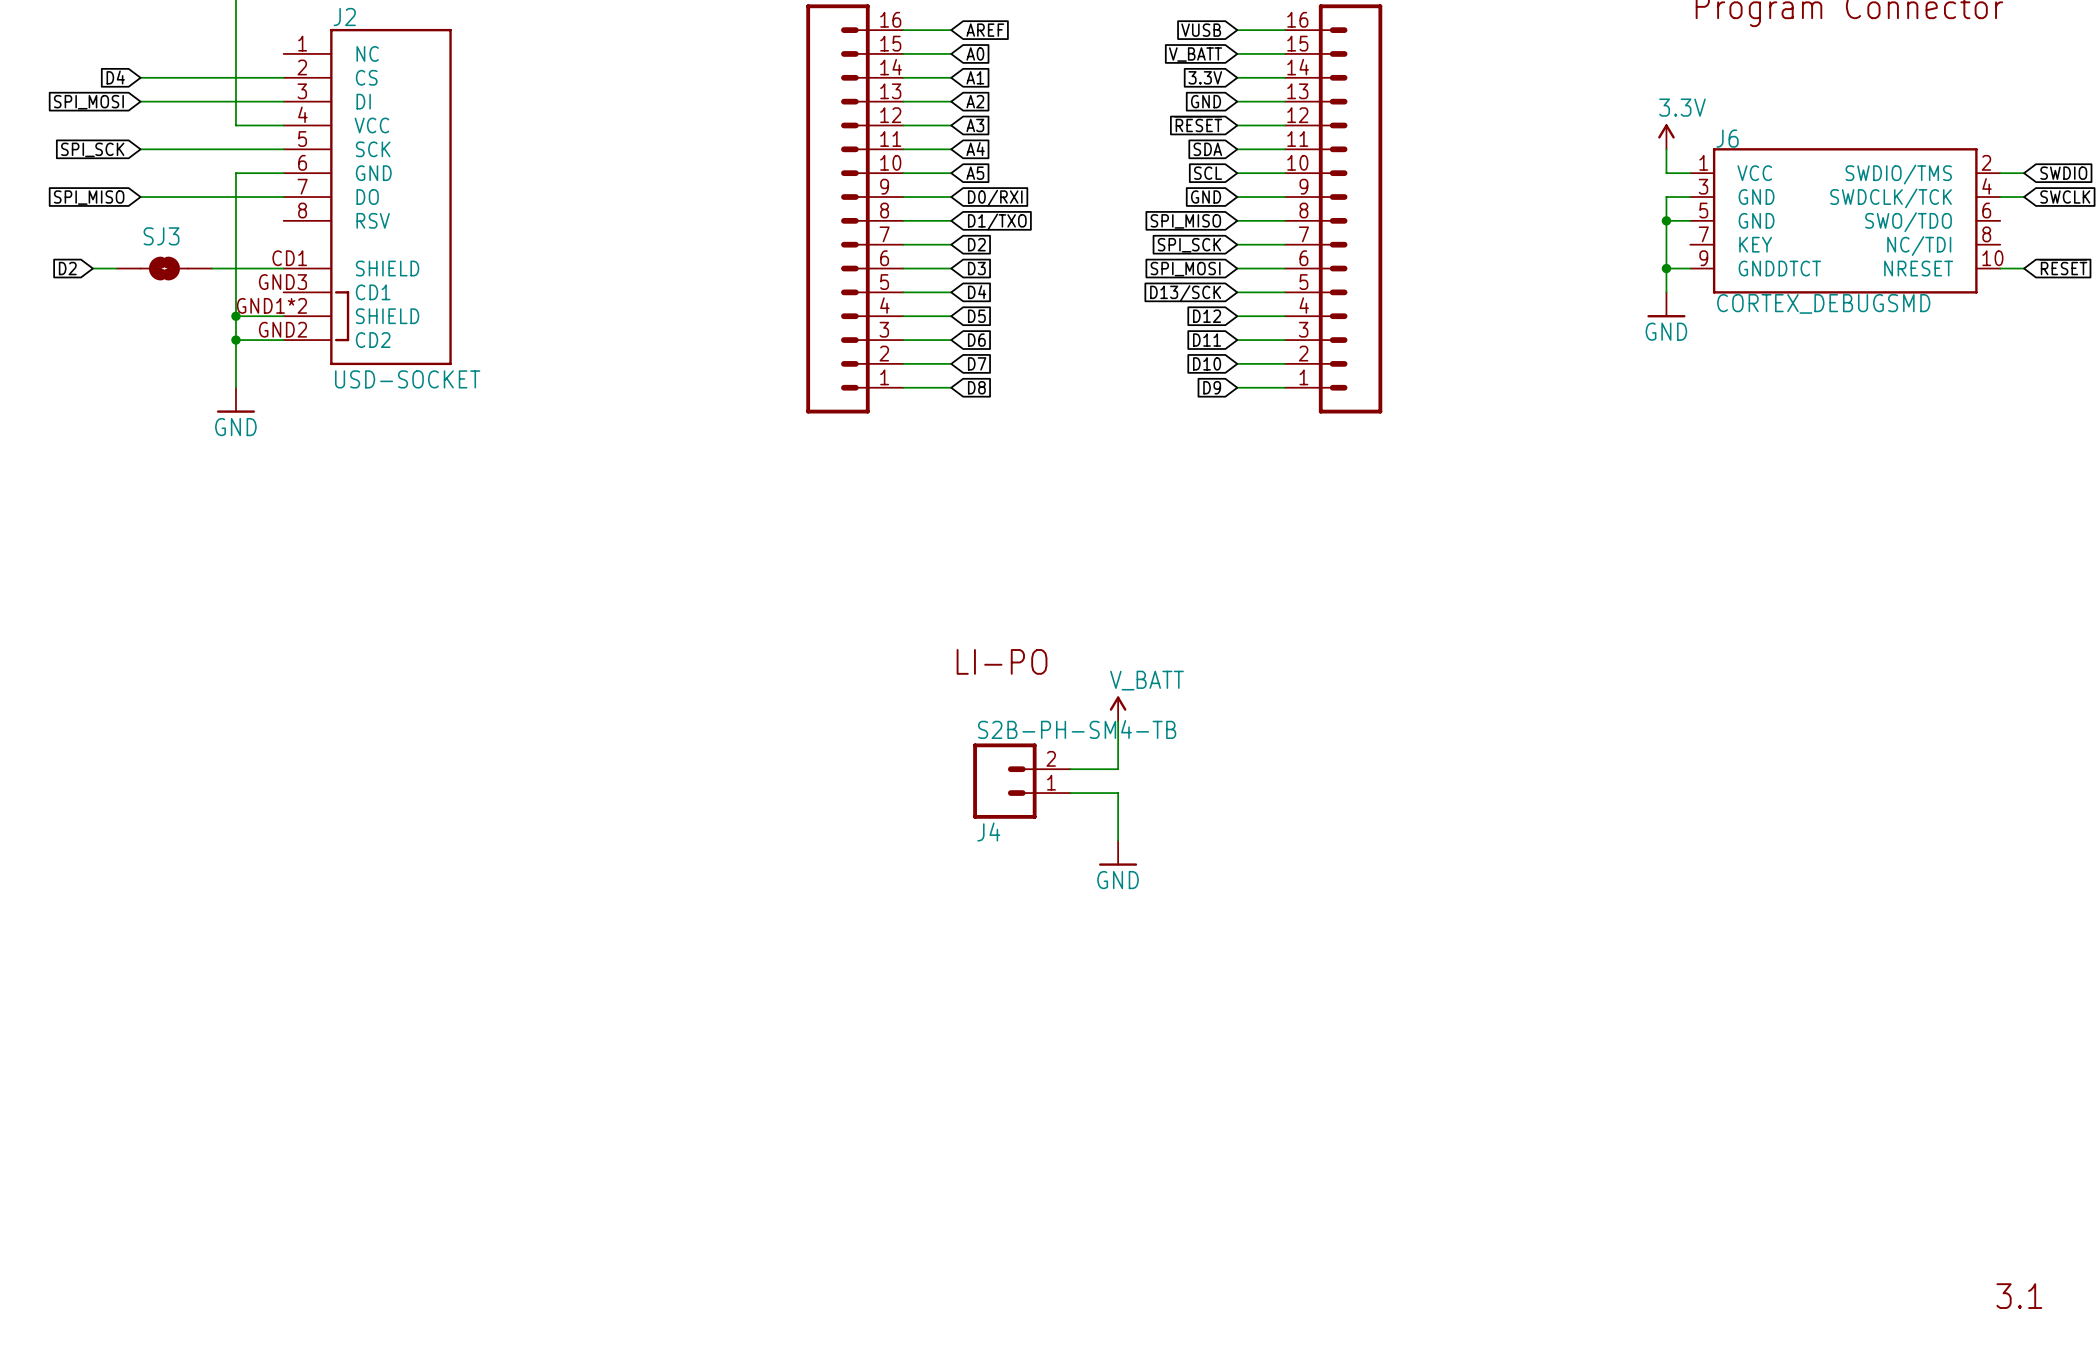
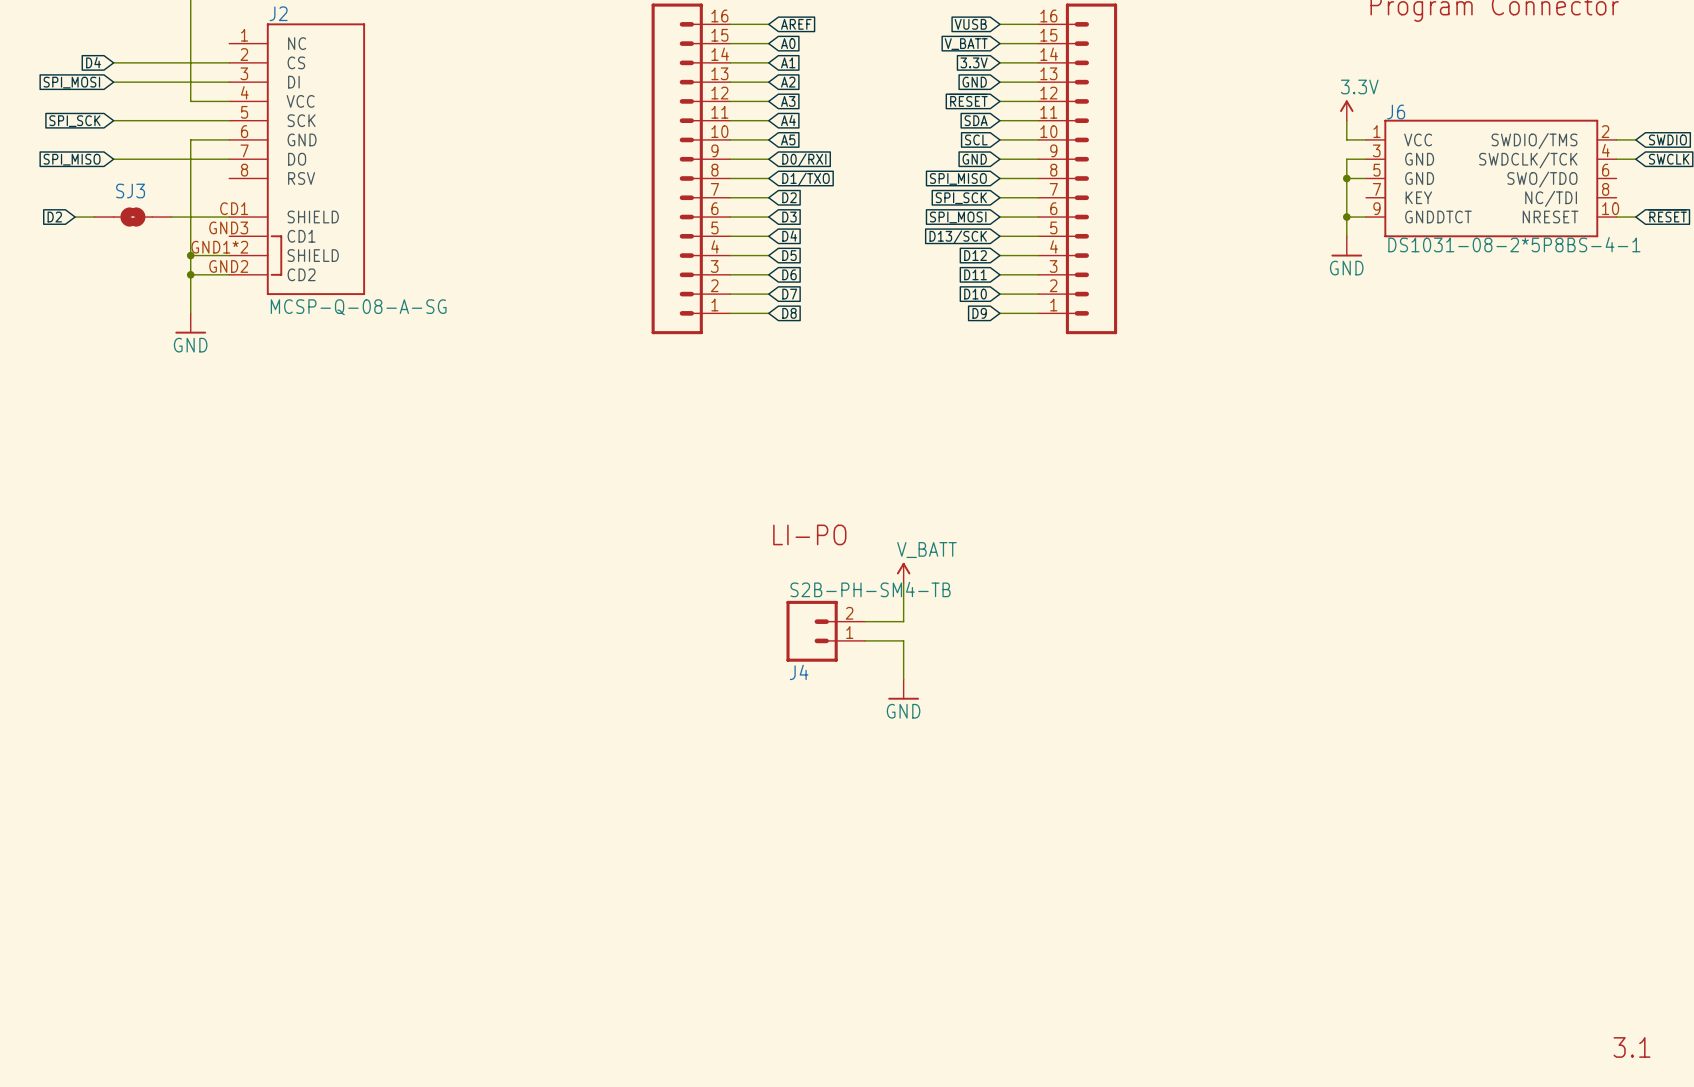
J6 value: CORTEX_DEBUGSMD (1823, 303) -> DS1031-08-2*5P8BS-4-1 (1514, 244)
J2 value: USD-SOCKET (407, 379) -> MCSP-Q-08-A-SG (358, 307)

